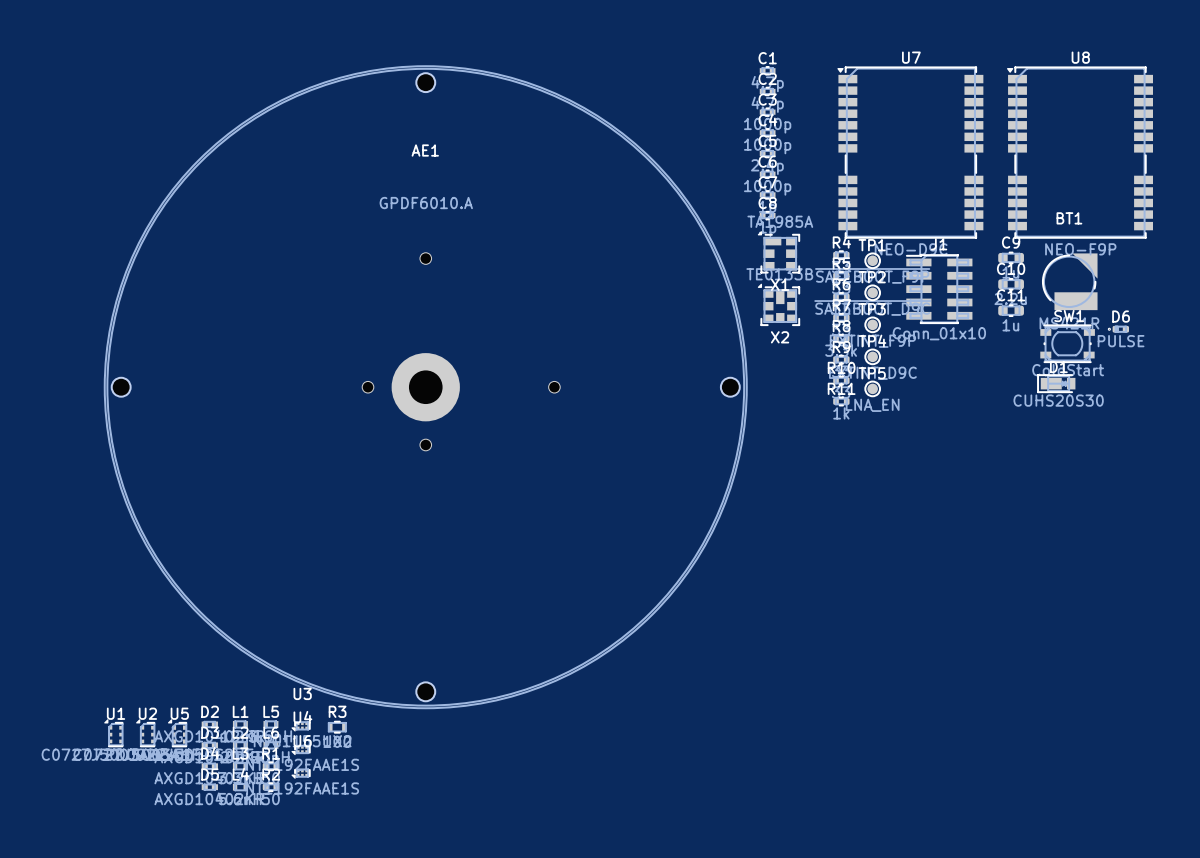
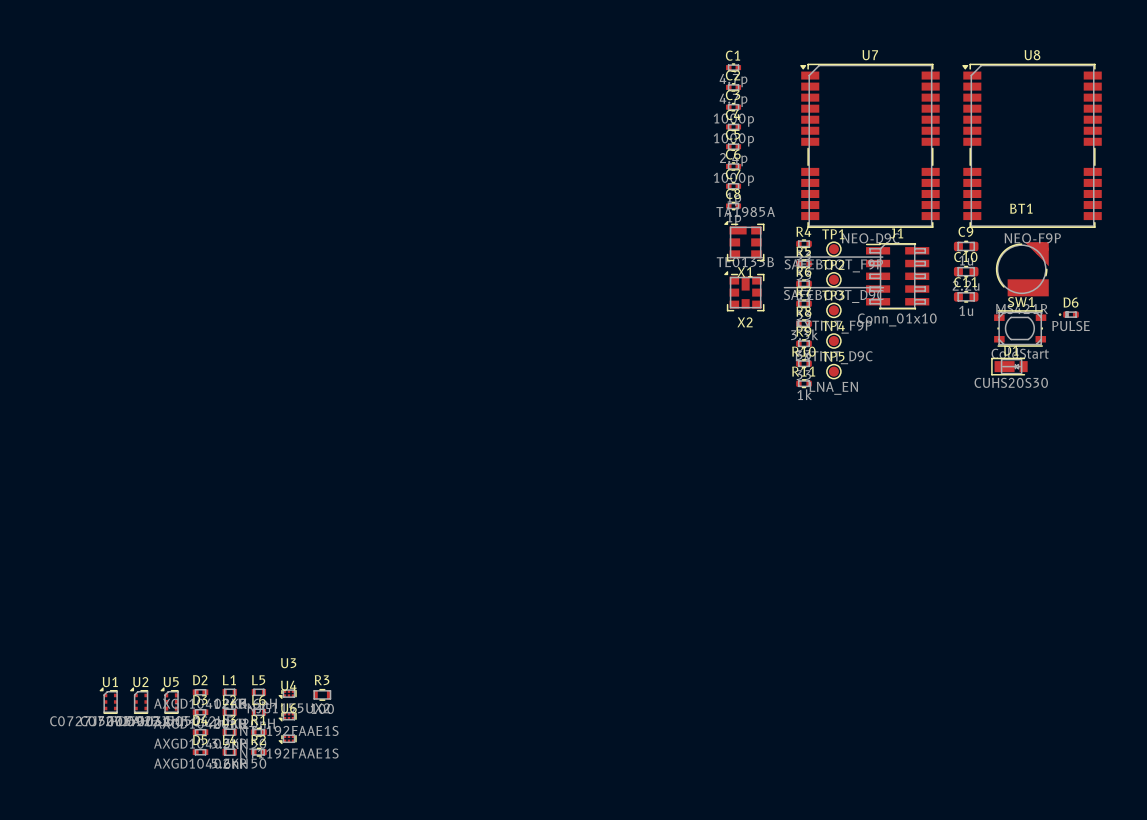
AE1: GPDF6010.A (425, 387) -> none

